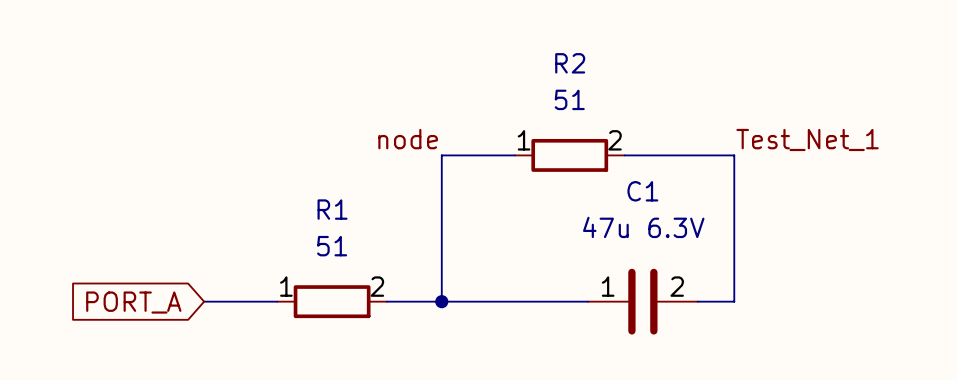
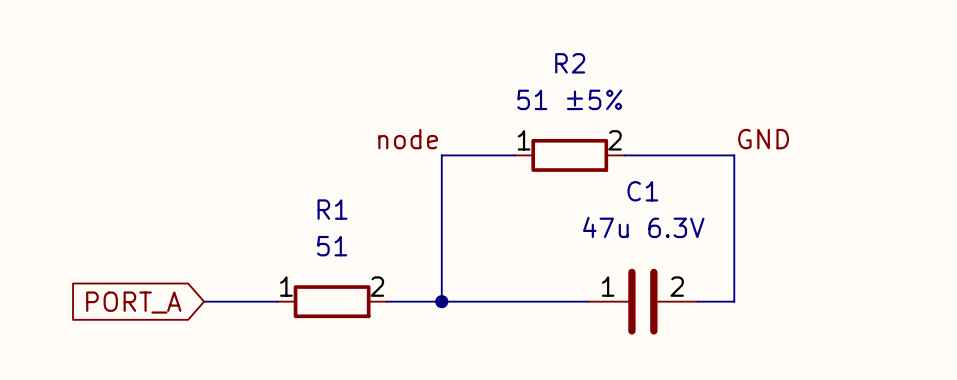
R2 value: 51 (569, 99) -> 51 ±5% (569, 99)
label: Test_Net_1 (807, 139) -> GND (763, 139)

